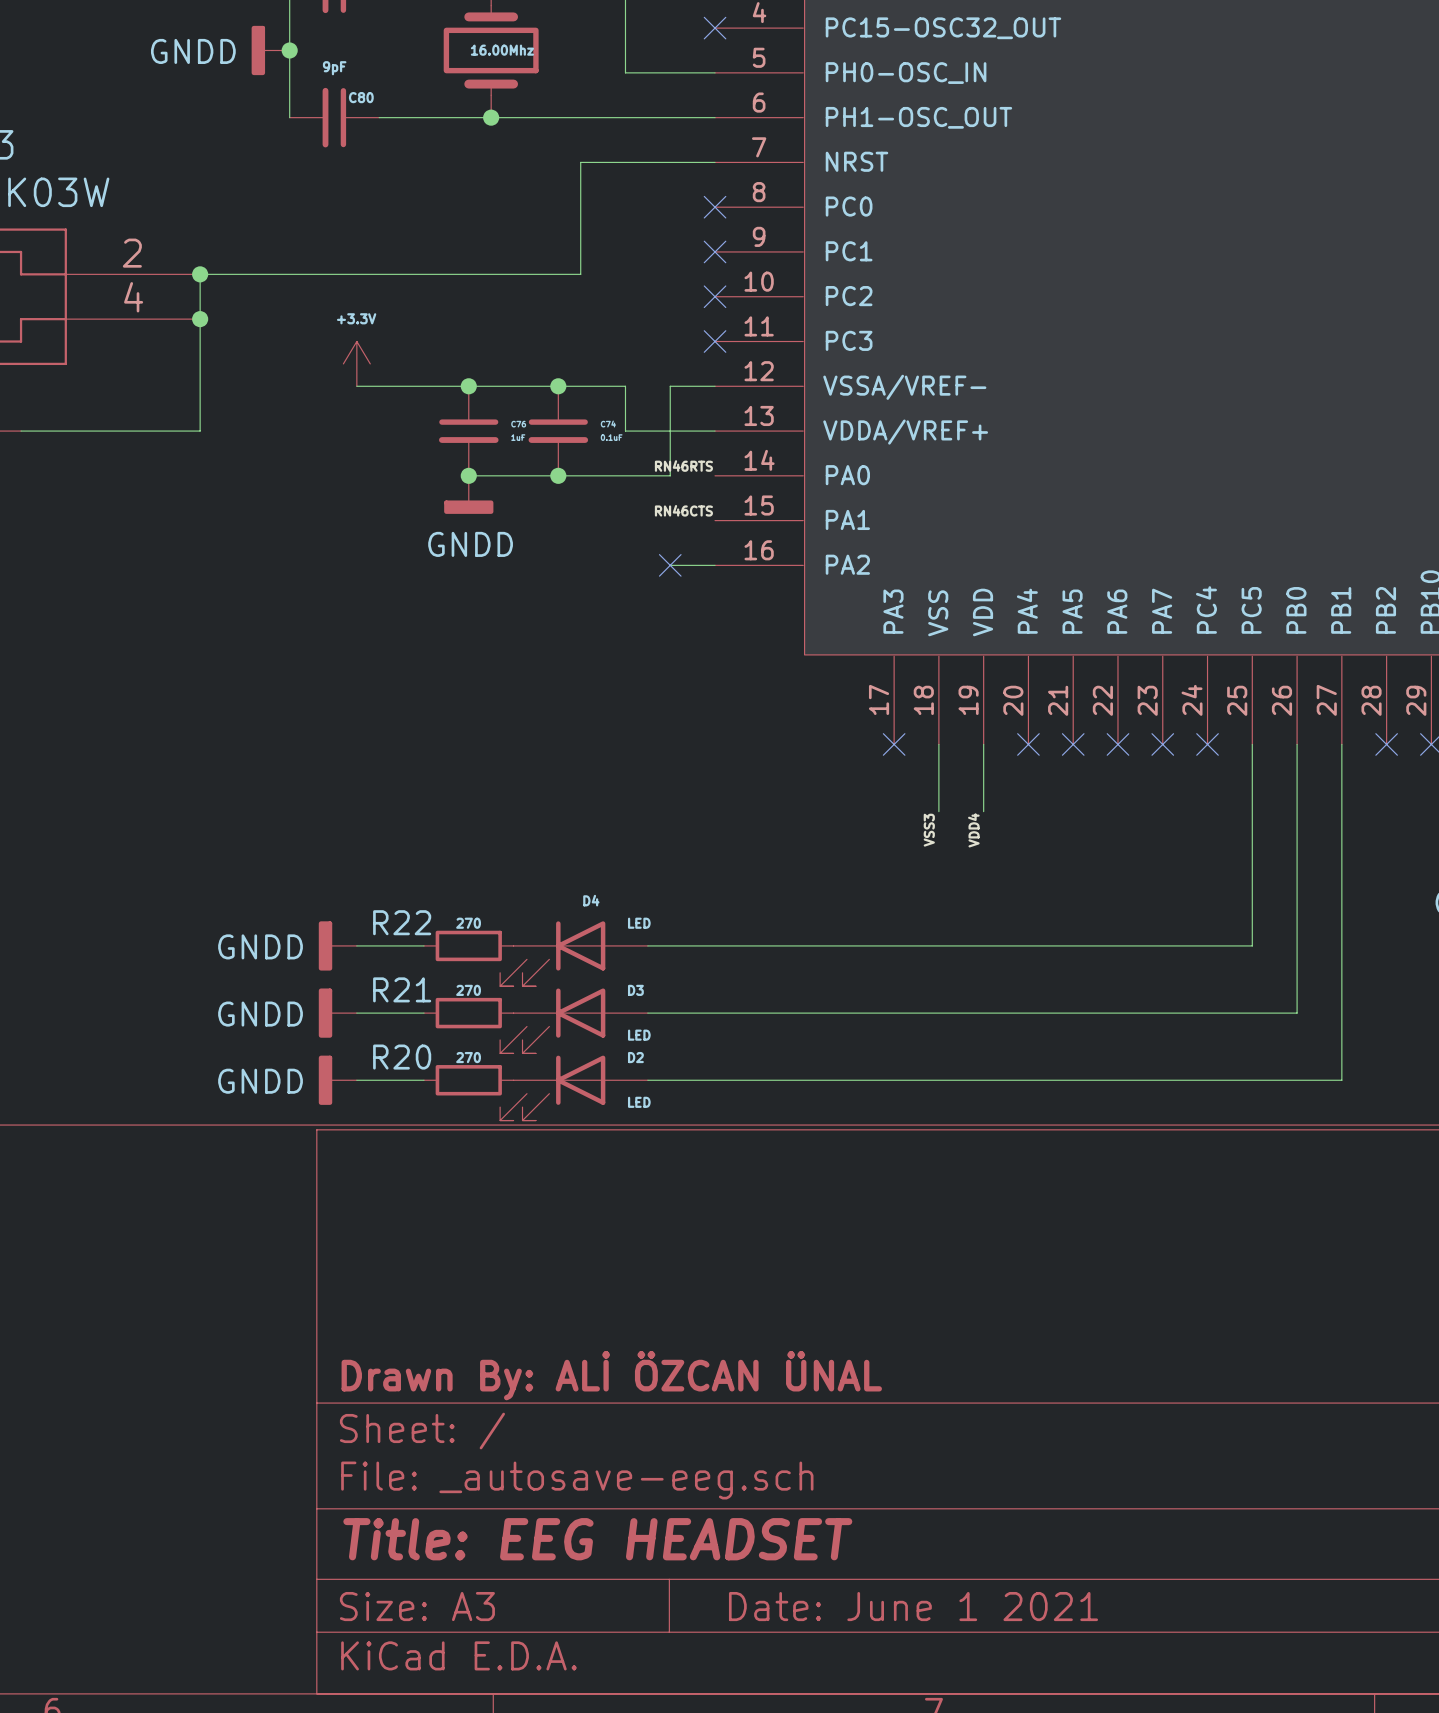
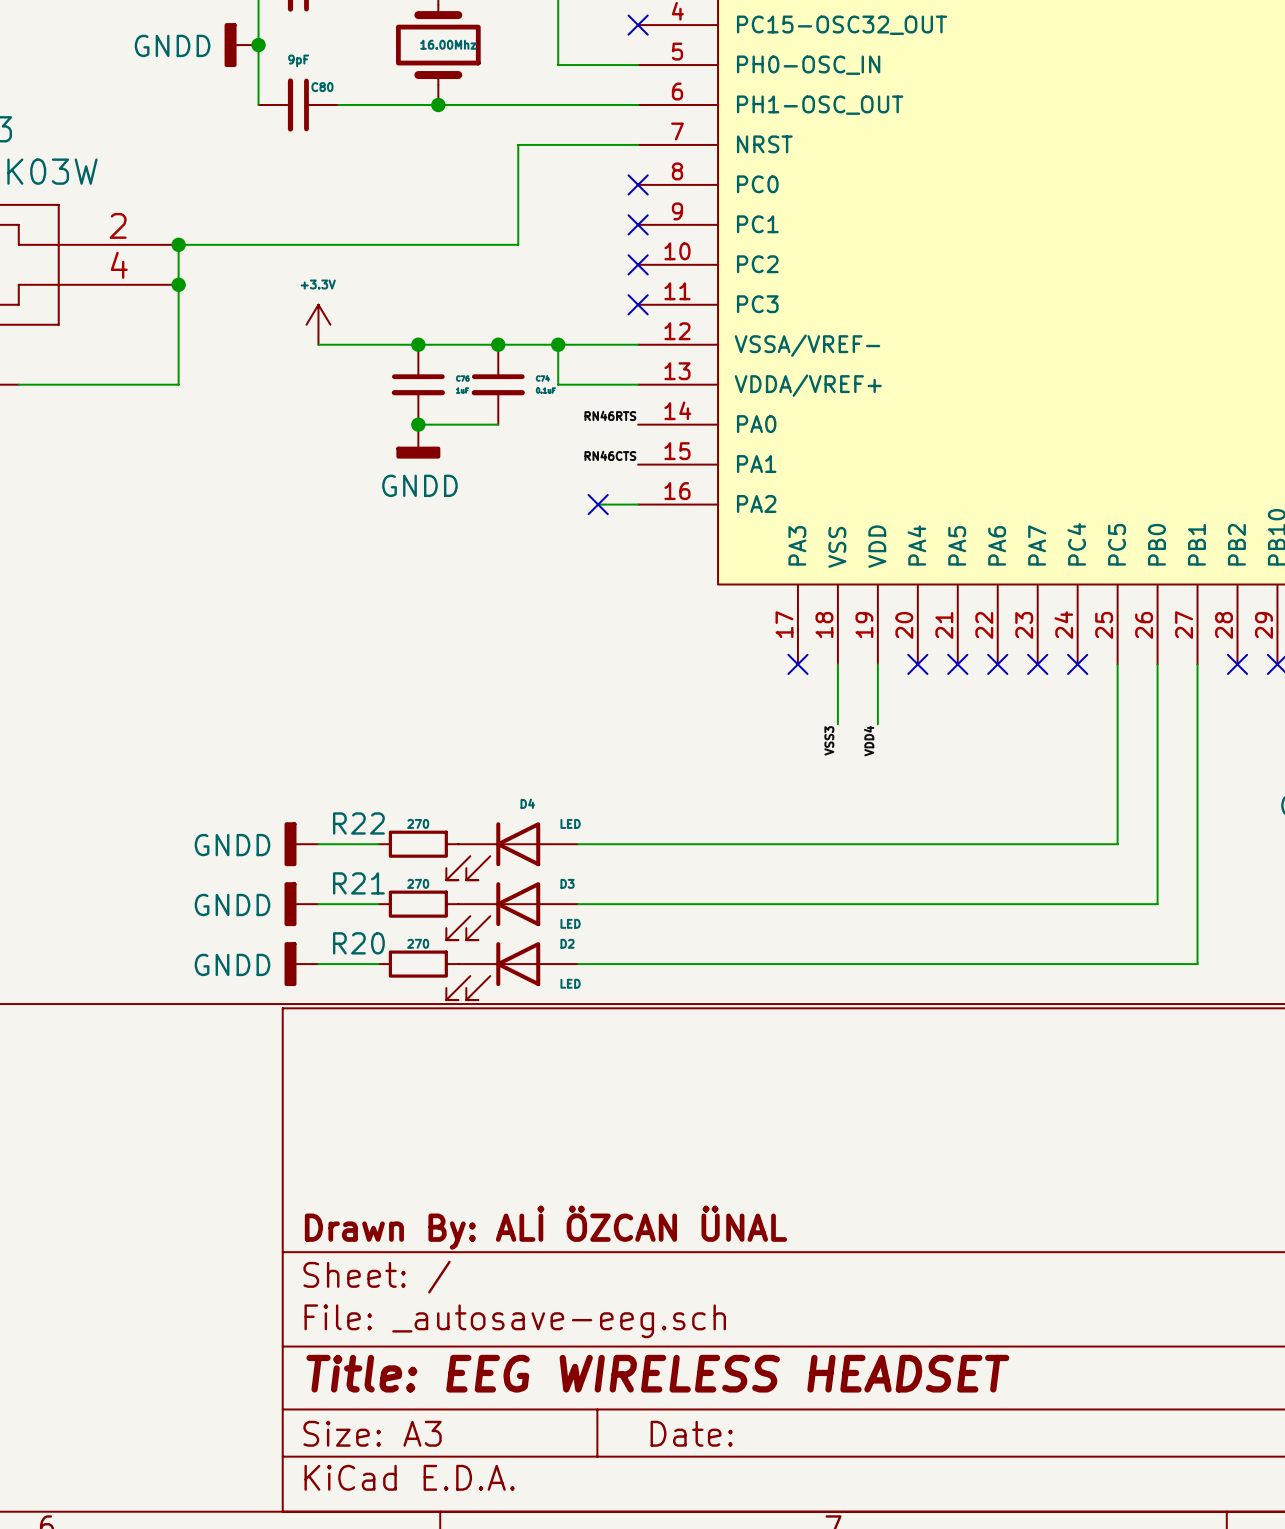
junction: none -> (558, 344)
wire: (670, 386) (670, 475) (558, 475) -> (598, 344) (558, 344)
junction: (558, 475) -> none
title block: Title: EEG HEADSET (597, 1539) -> Title: EEG WIRELESS HEADSET (657, 1373)
title block: Date: June 1 2021 (913, 1606) -> Date: (691, 1433)

